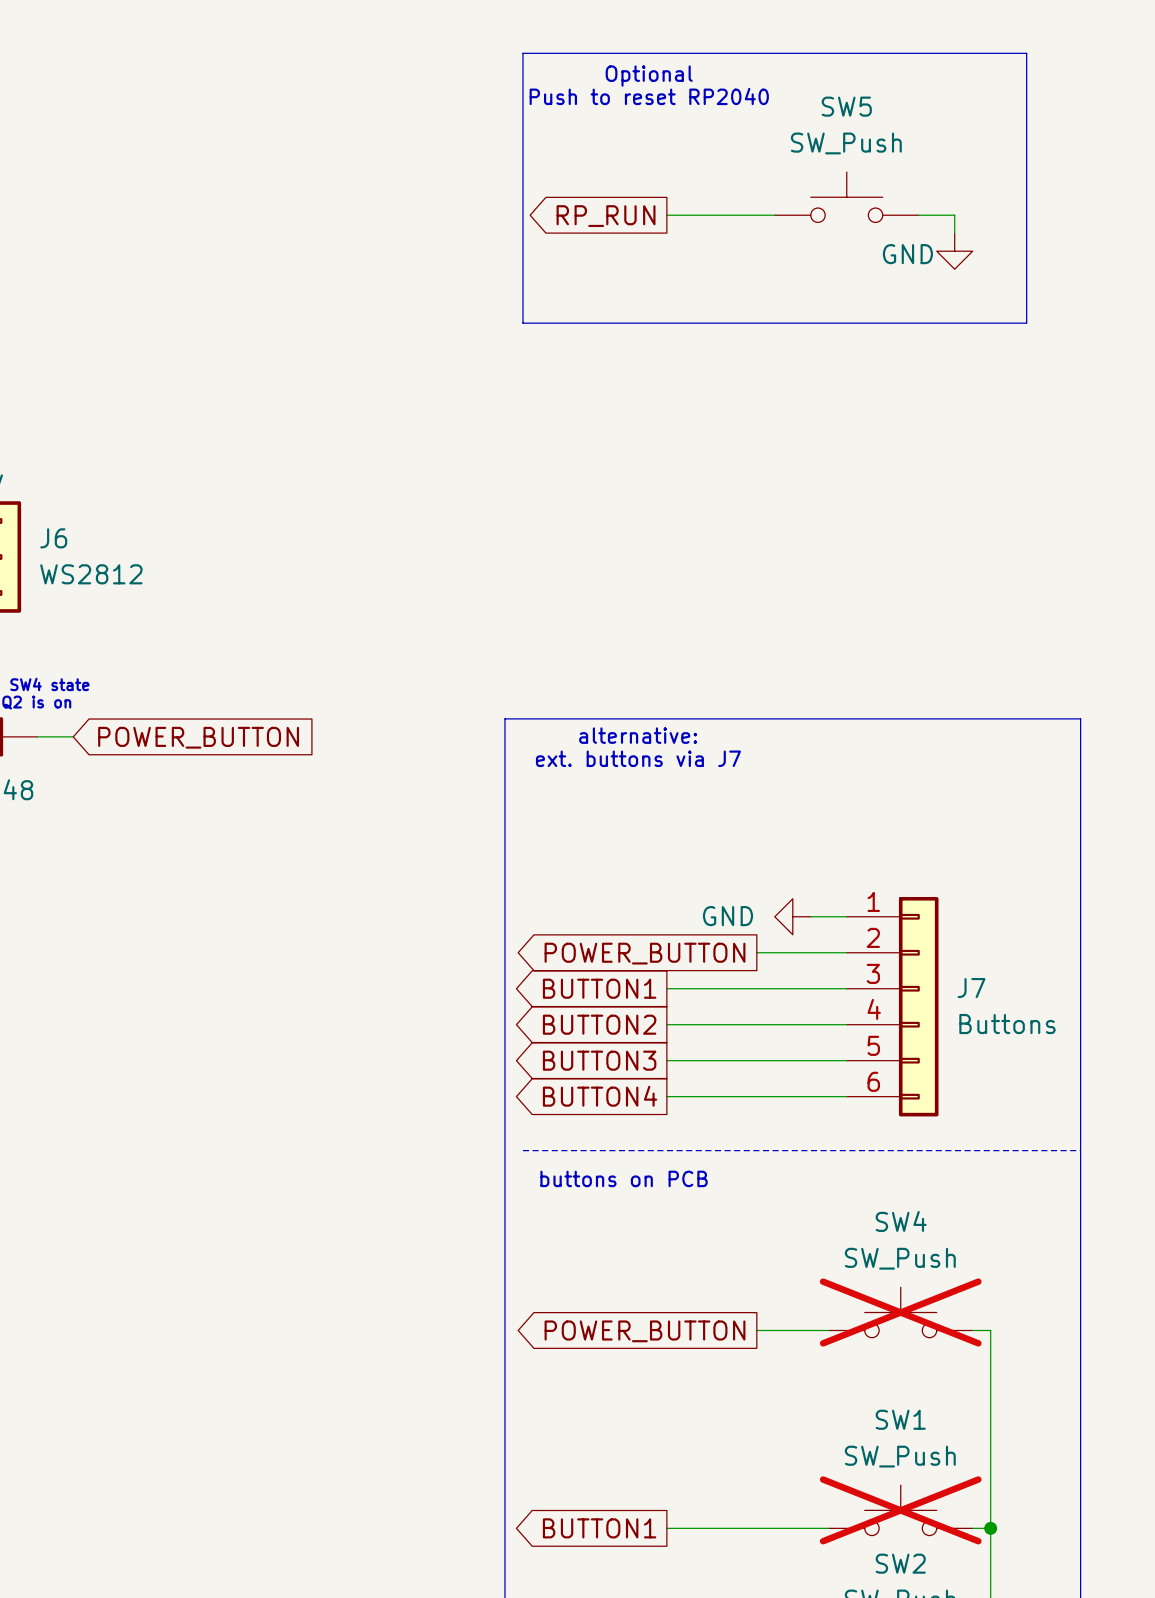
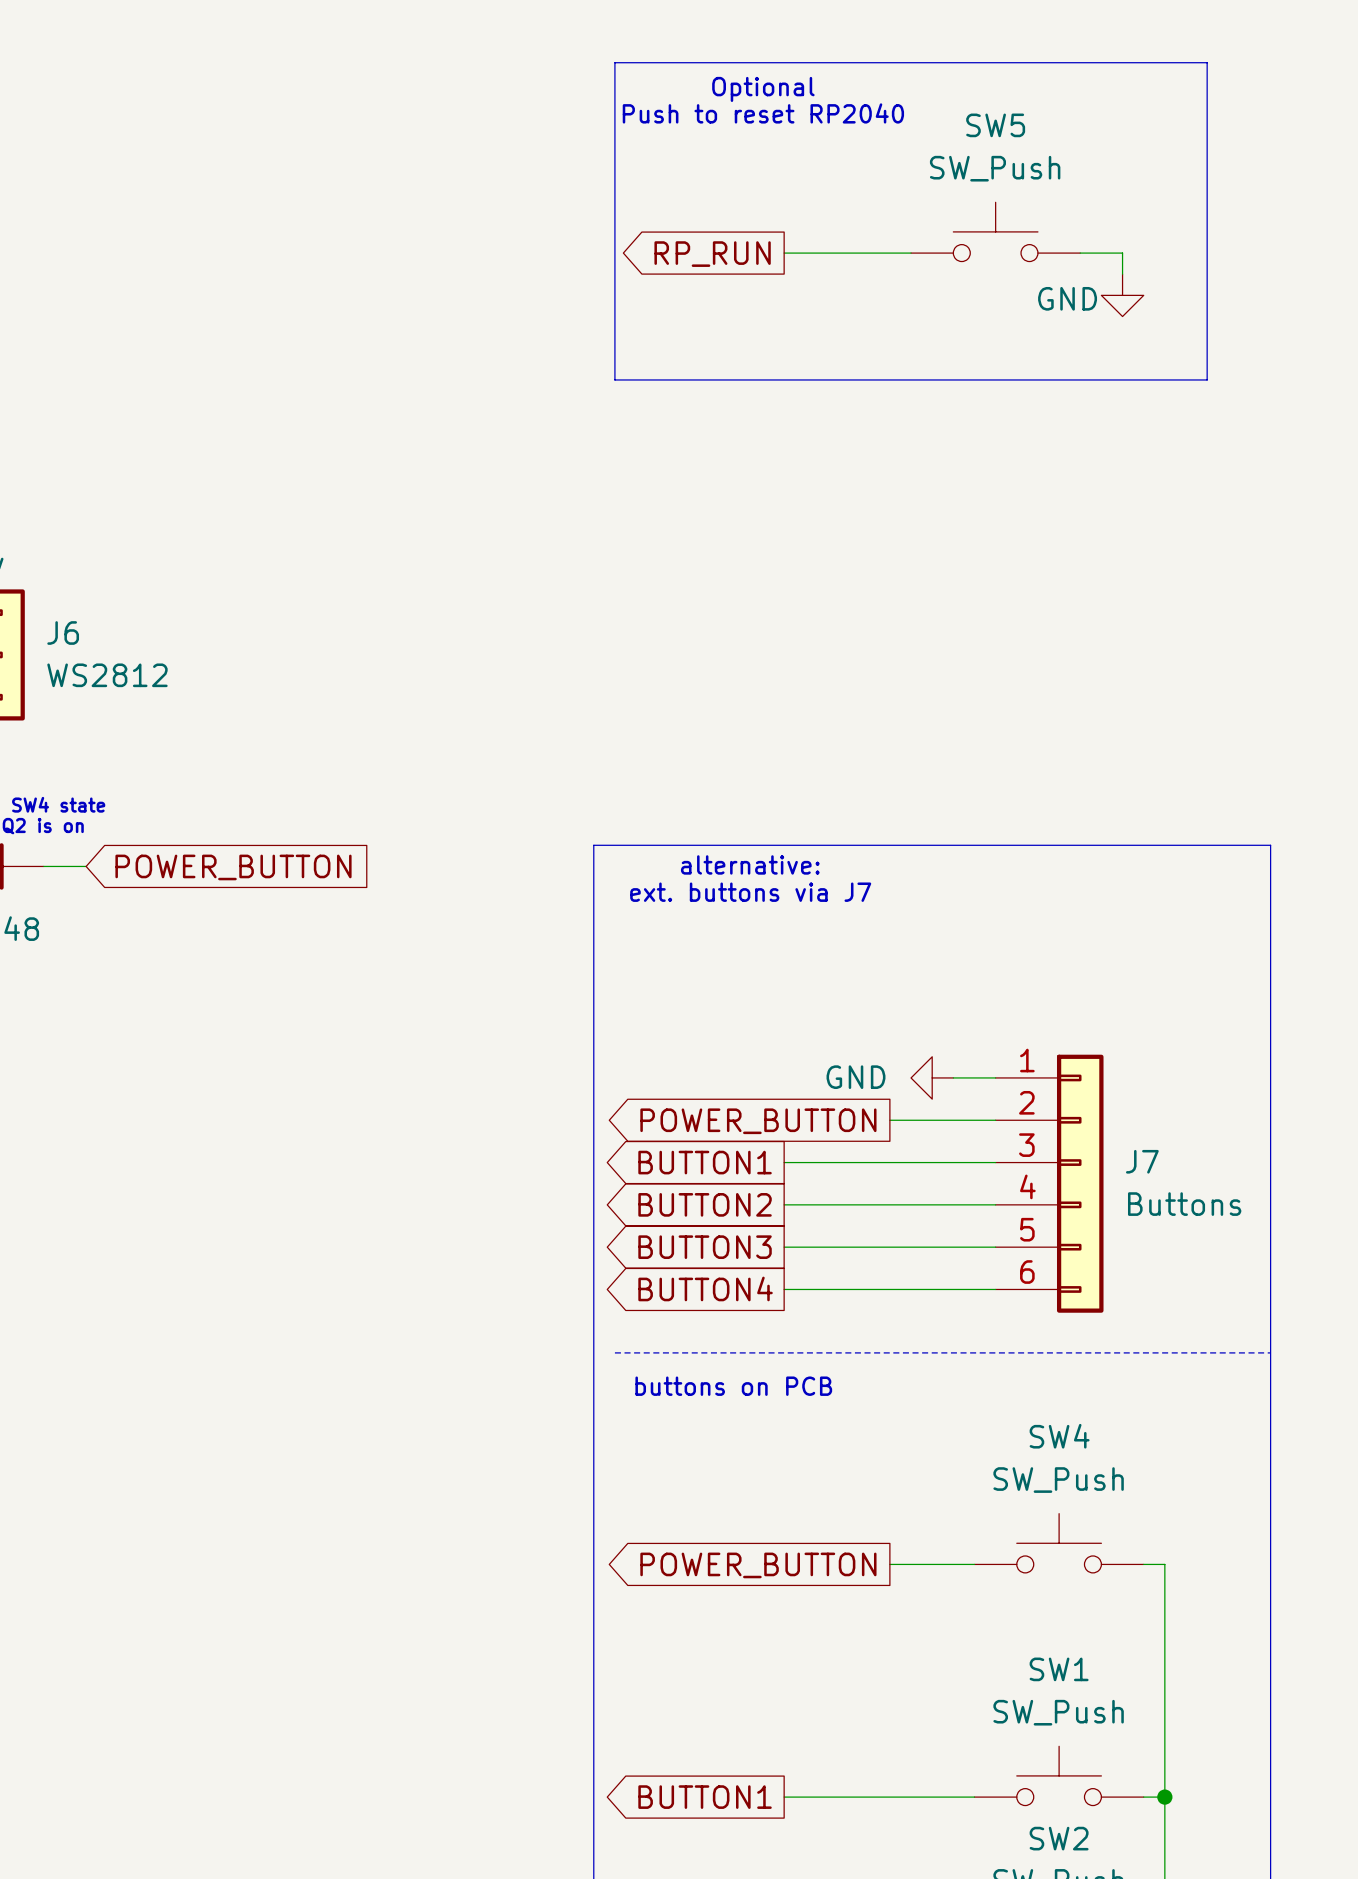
SW4 do-not-place cross: (900, 1312) -> none
SW1 do-not-place cross: (900, 1510) -> none

